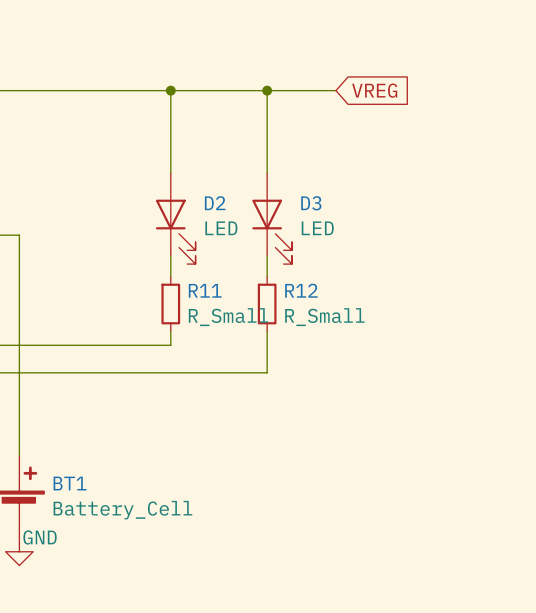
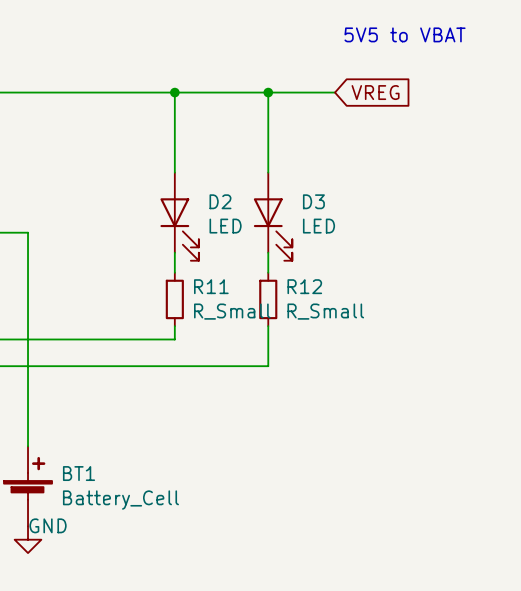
text: none -> 5V5 to VBAT (405, 34)

